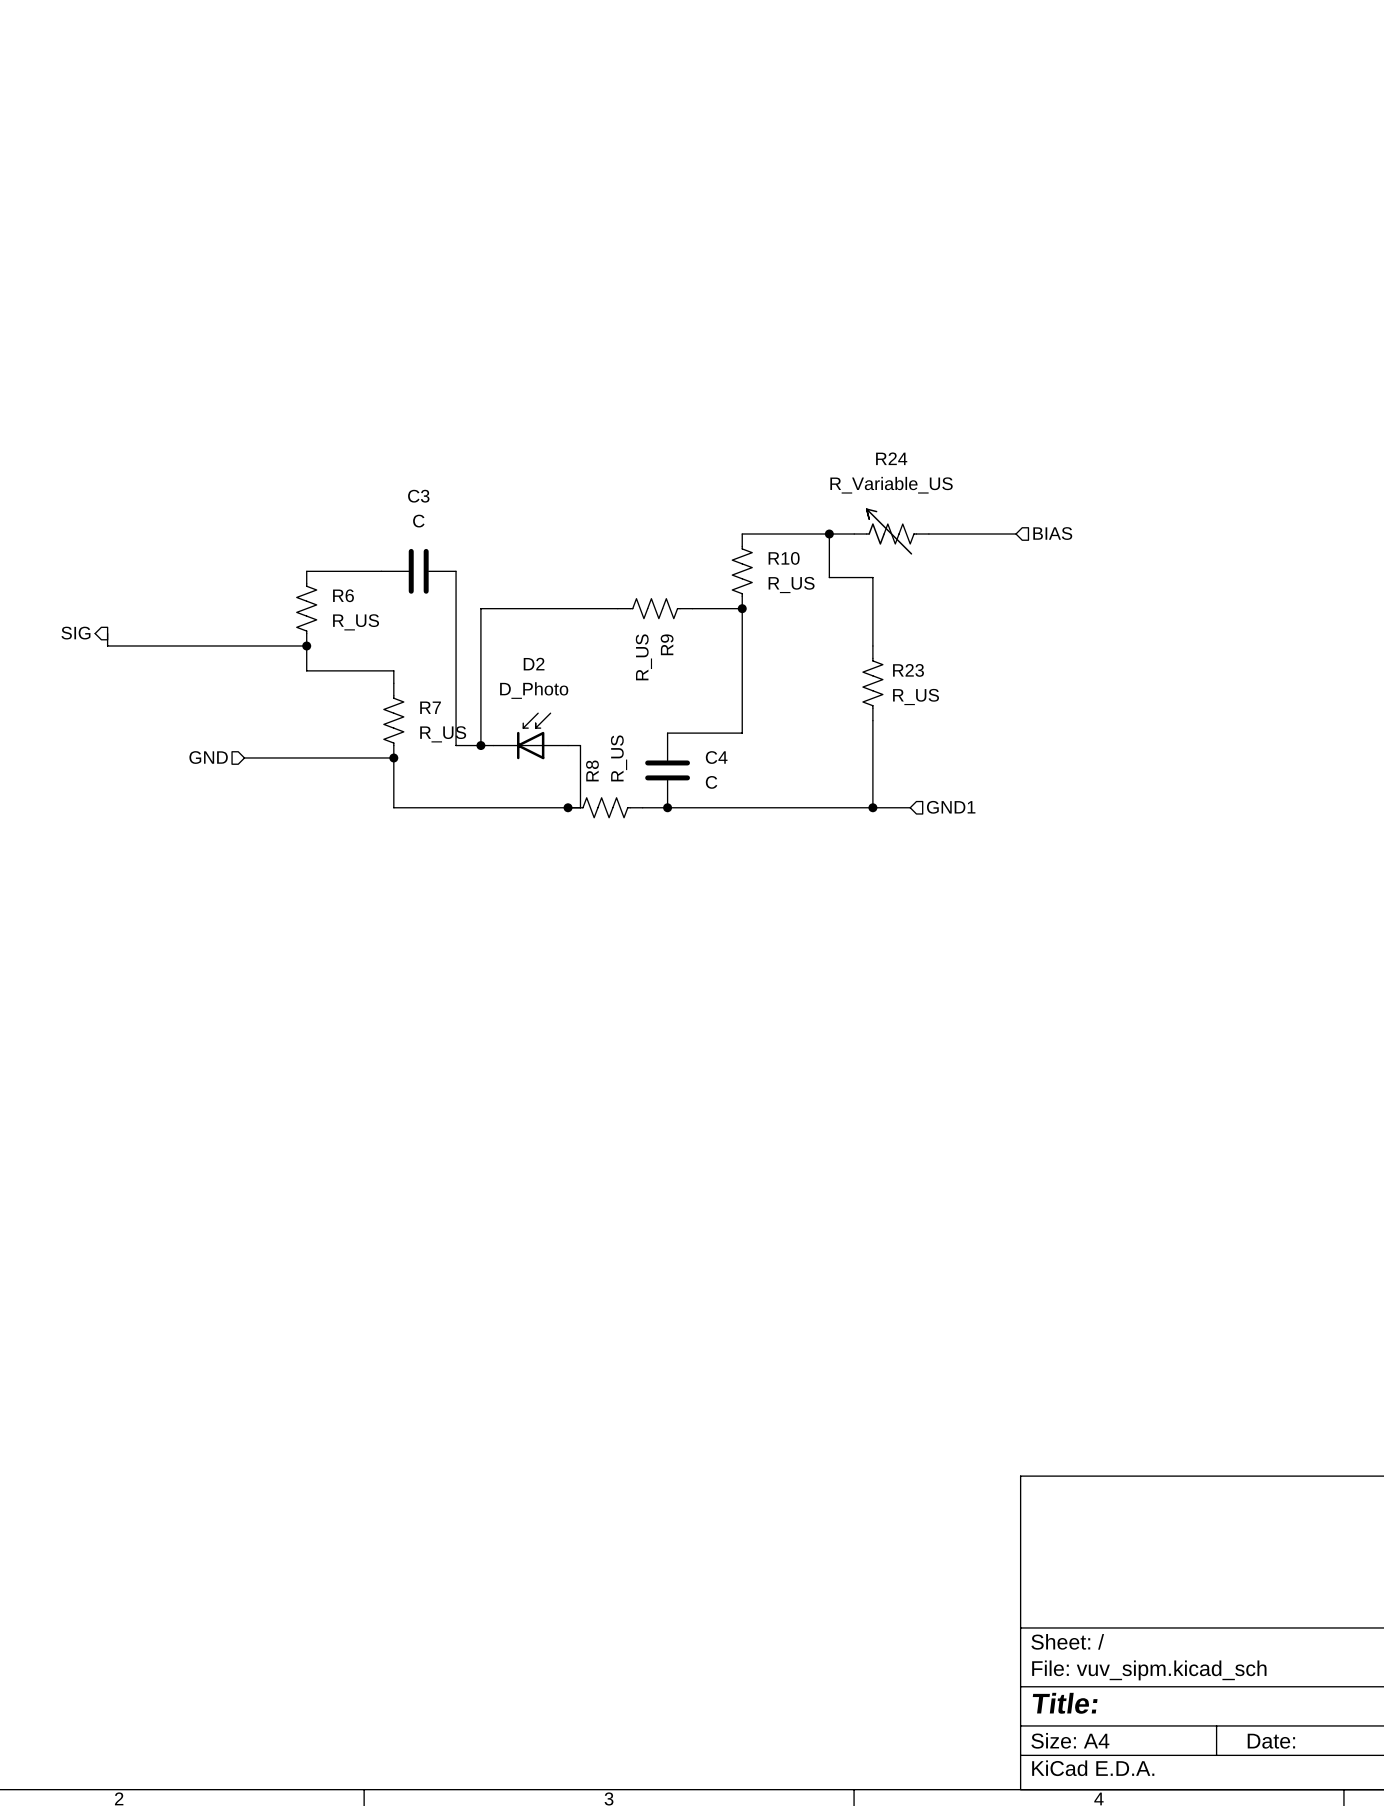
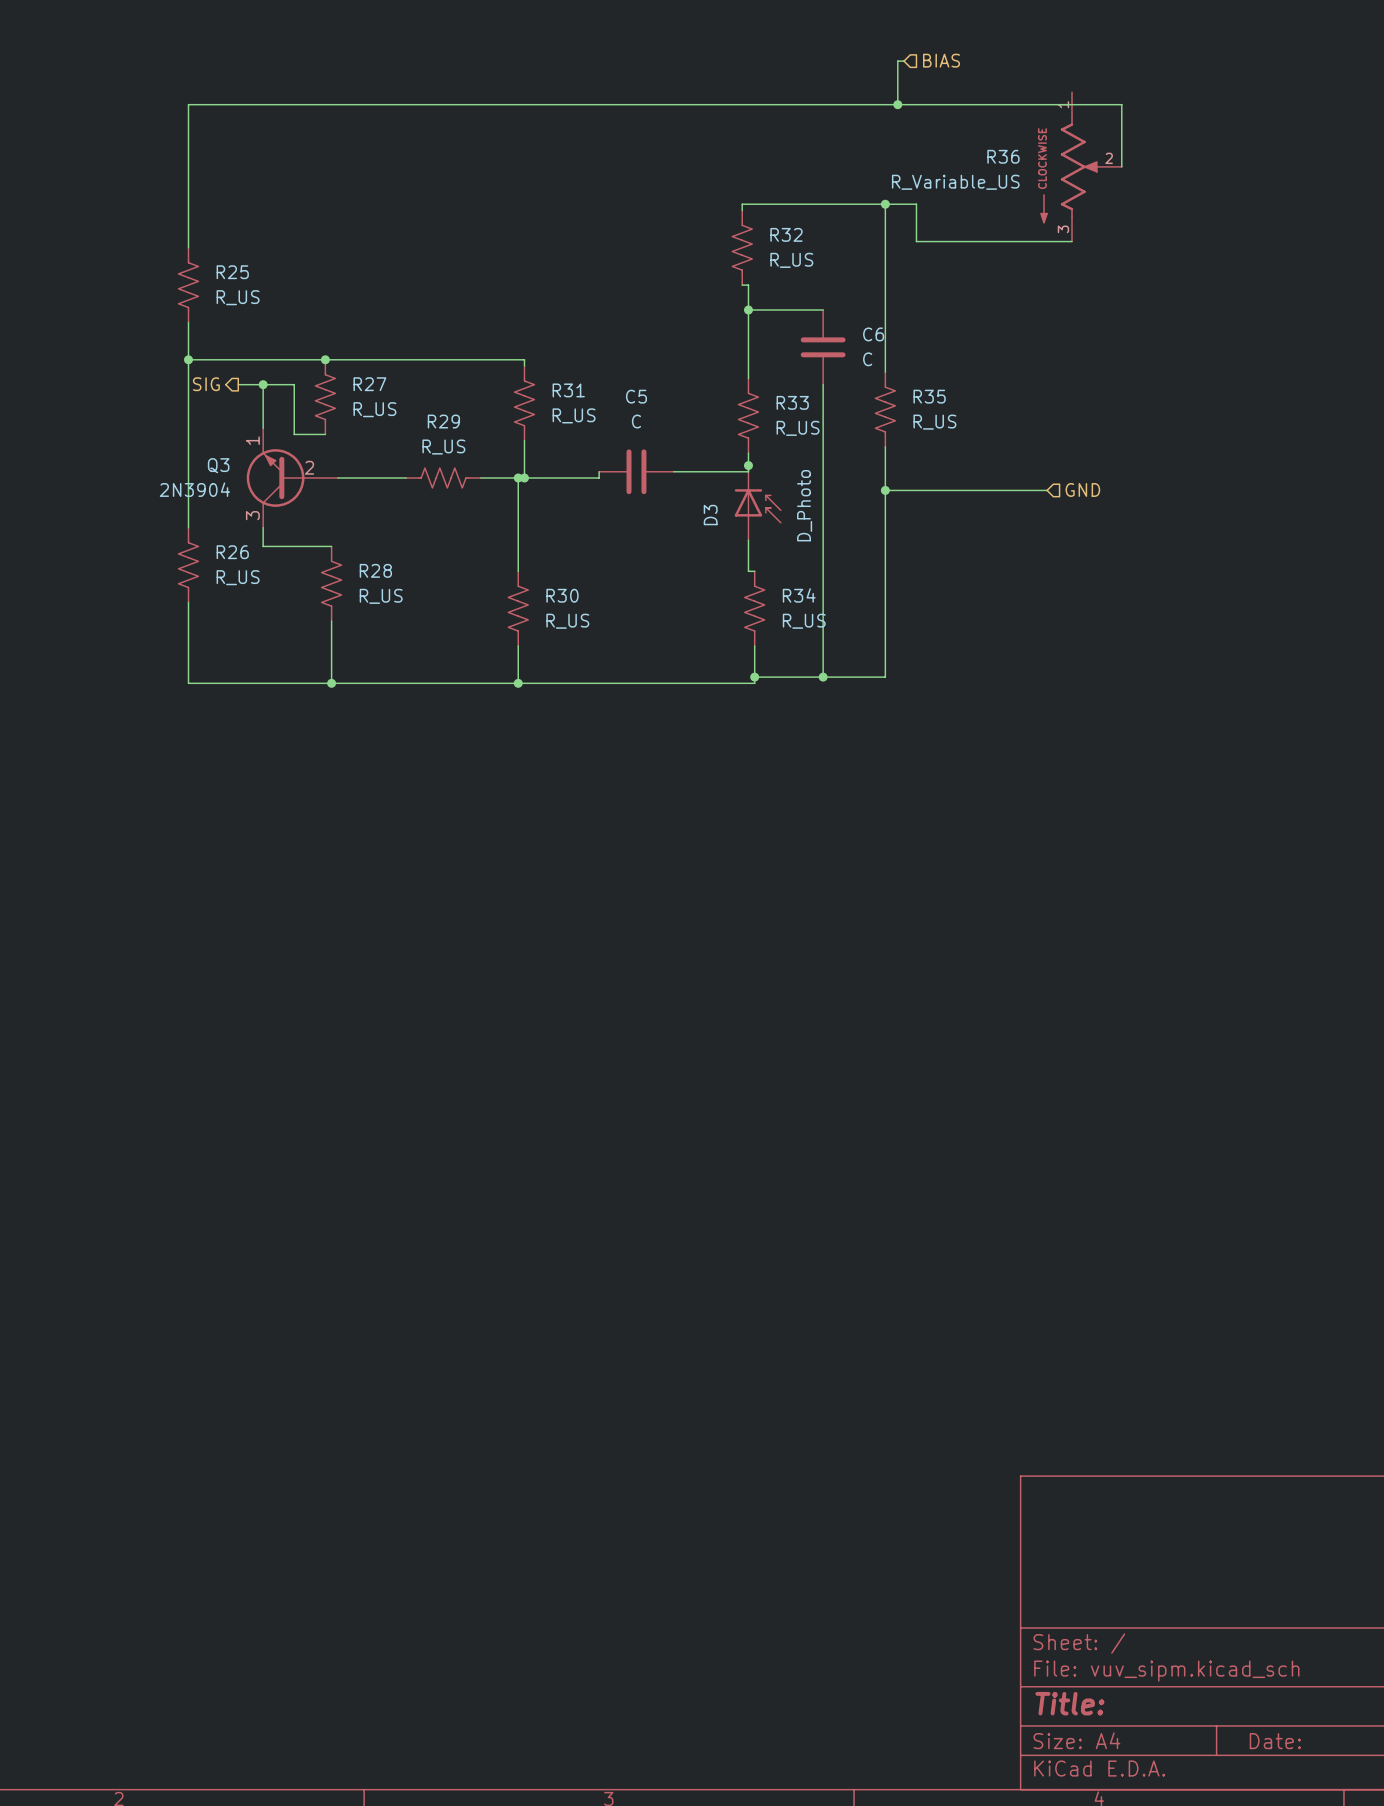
hierarchical label: none -> BIAS (941, 60)
wire: none -> (904, 61) (897, 61) (897, 104)
junction: none -> (897, 104)
R36: none -> R_Variable_US (1081, 166)
wire: none -> (1121, 166) (1121, 104) (188, 104) (188, 247)
wire: none -> (885, 204) (885, 372)
junction: none -> (885, 204)
wire: none -> (742, 210) (742, 204) (916, 204) (916, 241) (1072, 241)
R32: none -> R_US (742, 247)
R25: none -> R_US (188, 285)
wire: none -> (742, 285) (748, 285) (748, 378)
wire: none -> (748, 310) (823, 310)
junction: none -> (748, 310)
wire: none -> (188, 322) (188, 527)
C6: none -> C (823, 347)
wire: none -> (188, 359) (524, 359) (524, 366)
junction: none -> (188, 359)
junction: none -> (325, 359)
hierarchical label: none -> SIG (206, 384)
wire: none -> (238, 384) (294, 384) (294, 434) (325, 434)
wire: none -> (263, 384) (263, 428)
junction: none -> (263, 384)
wire: none -> (823, 384) (823, 677)
R27: none -> R_US (325, 397)
R31: none -> R_US (524, 403)
R35: none -> R_US (885, 409)
R33: none -> R_US (748, 415)
wire: none -> (524, 440) (524, 478)
wire: none -> (885, 446) (885, 677) (754, 677)
wire: none -> (748, 453) (748, 471) (673, 471)
junction: none -> (748, 465)
wire: none -> (599, 471) (599, 478) (480, 478)
C5: none -> C (636, 471)
Q3: none -> 2N3904 (292, 478)
wire: none -> (337, 478) (406, 478)
R29: none -> R_US (443, 478)
wire: none -> (518, 478) (518, 571)
junction: none -> (518, 478)
junction: none -> (524, 478)
hierarchical label: none -> GND (1082, 489)
wire: none -> (885, 490) (1047, 490)
junction: none -> (885, 490)
D3: none -> D_Photo (757, 502)
wire: none -> (263, 527) (263, 546) (331, 546)
R24: R_Variable_US (891, 531) -> none
hierarchical label: BIAS (1052, 533) -> none
wire: (742, 534) (854, 534) -> none
wire: (829, 534) (829, 577) (872, 577) (872, 645) -> none
junction: (829, 534) -> none
wire: (928, 534) (1016, 534) -> none
wire: none -> (748, 540) (748, 571) (754, 571)
R26: none -> R_US (188, 565)
wire: (306, 571) (381, 571) -> none
C3: C (418, 571) -> none
wire: (456, 571) (456, 745) (493, 745) -> none
R10: R_US (742, 571) -> none
R28: none -> R_US (331, 583)
wire: none -> (188, 602) (188, 683) (754, 683) (754, 645)
R6: R_US (306, 608) -> none
R30: none -> R_US (518, 608)
wire: (617, 608) (480, 608) (480, 745) -> none
R9: R_US (655, 608) -> none
wire: (692, 608) (742, 608) (742, 733) (667, 733) -> none
junction: (742, 608) -> none
R34: none -> R_US (754, 608)
wire: none -> (331, 621) (331, 683)
hierarchical label: SIG (75, 633) -> none
wire: (107, 633) (107, 645) (306, 645) (306, 670) (393, 670) (393, 683) -> none
junction position: (306, 645) -> (331, 683)
wire: none -> (518, 645) (518, 683)
junction: none -> (754, 677)
junction: none -> (823, 677)
junction: none -> (518, 683)
R23: R_US (872, 683) -> none
R7: R_US (393, 720) -> none
wire: (872, 720) (872, 807) -> none
D2: D_Photo (530, 736) -> none
junction: (480, 745) -> none
wire: (568, 745) (580, 745) (580, 807) (393, 807) (393, 757) (244, 757) -> none
hierarchical label: GND (208, 757) -> none
junction: (393, 757) -> none
C4: C (667, 770) -> none
junction: (568, 807) -> none
R8: R_US (605, 807) -> none
wire: (642, 807) (910, 807) -> none
junction: (667, 807) -> none
junction: (872, 807) -> none
hierarchical label: GND1 (951, 807) -> none

